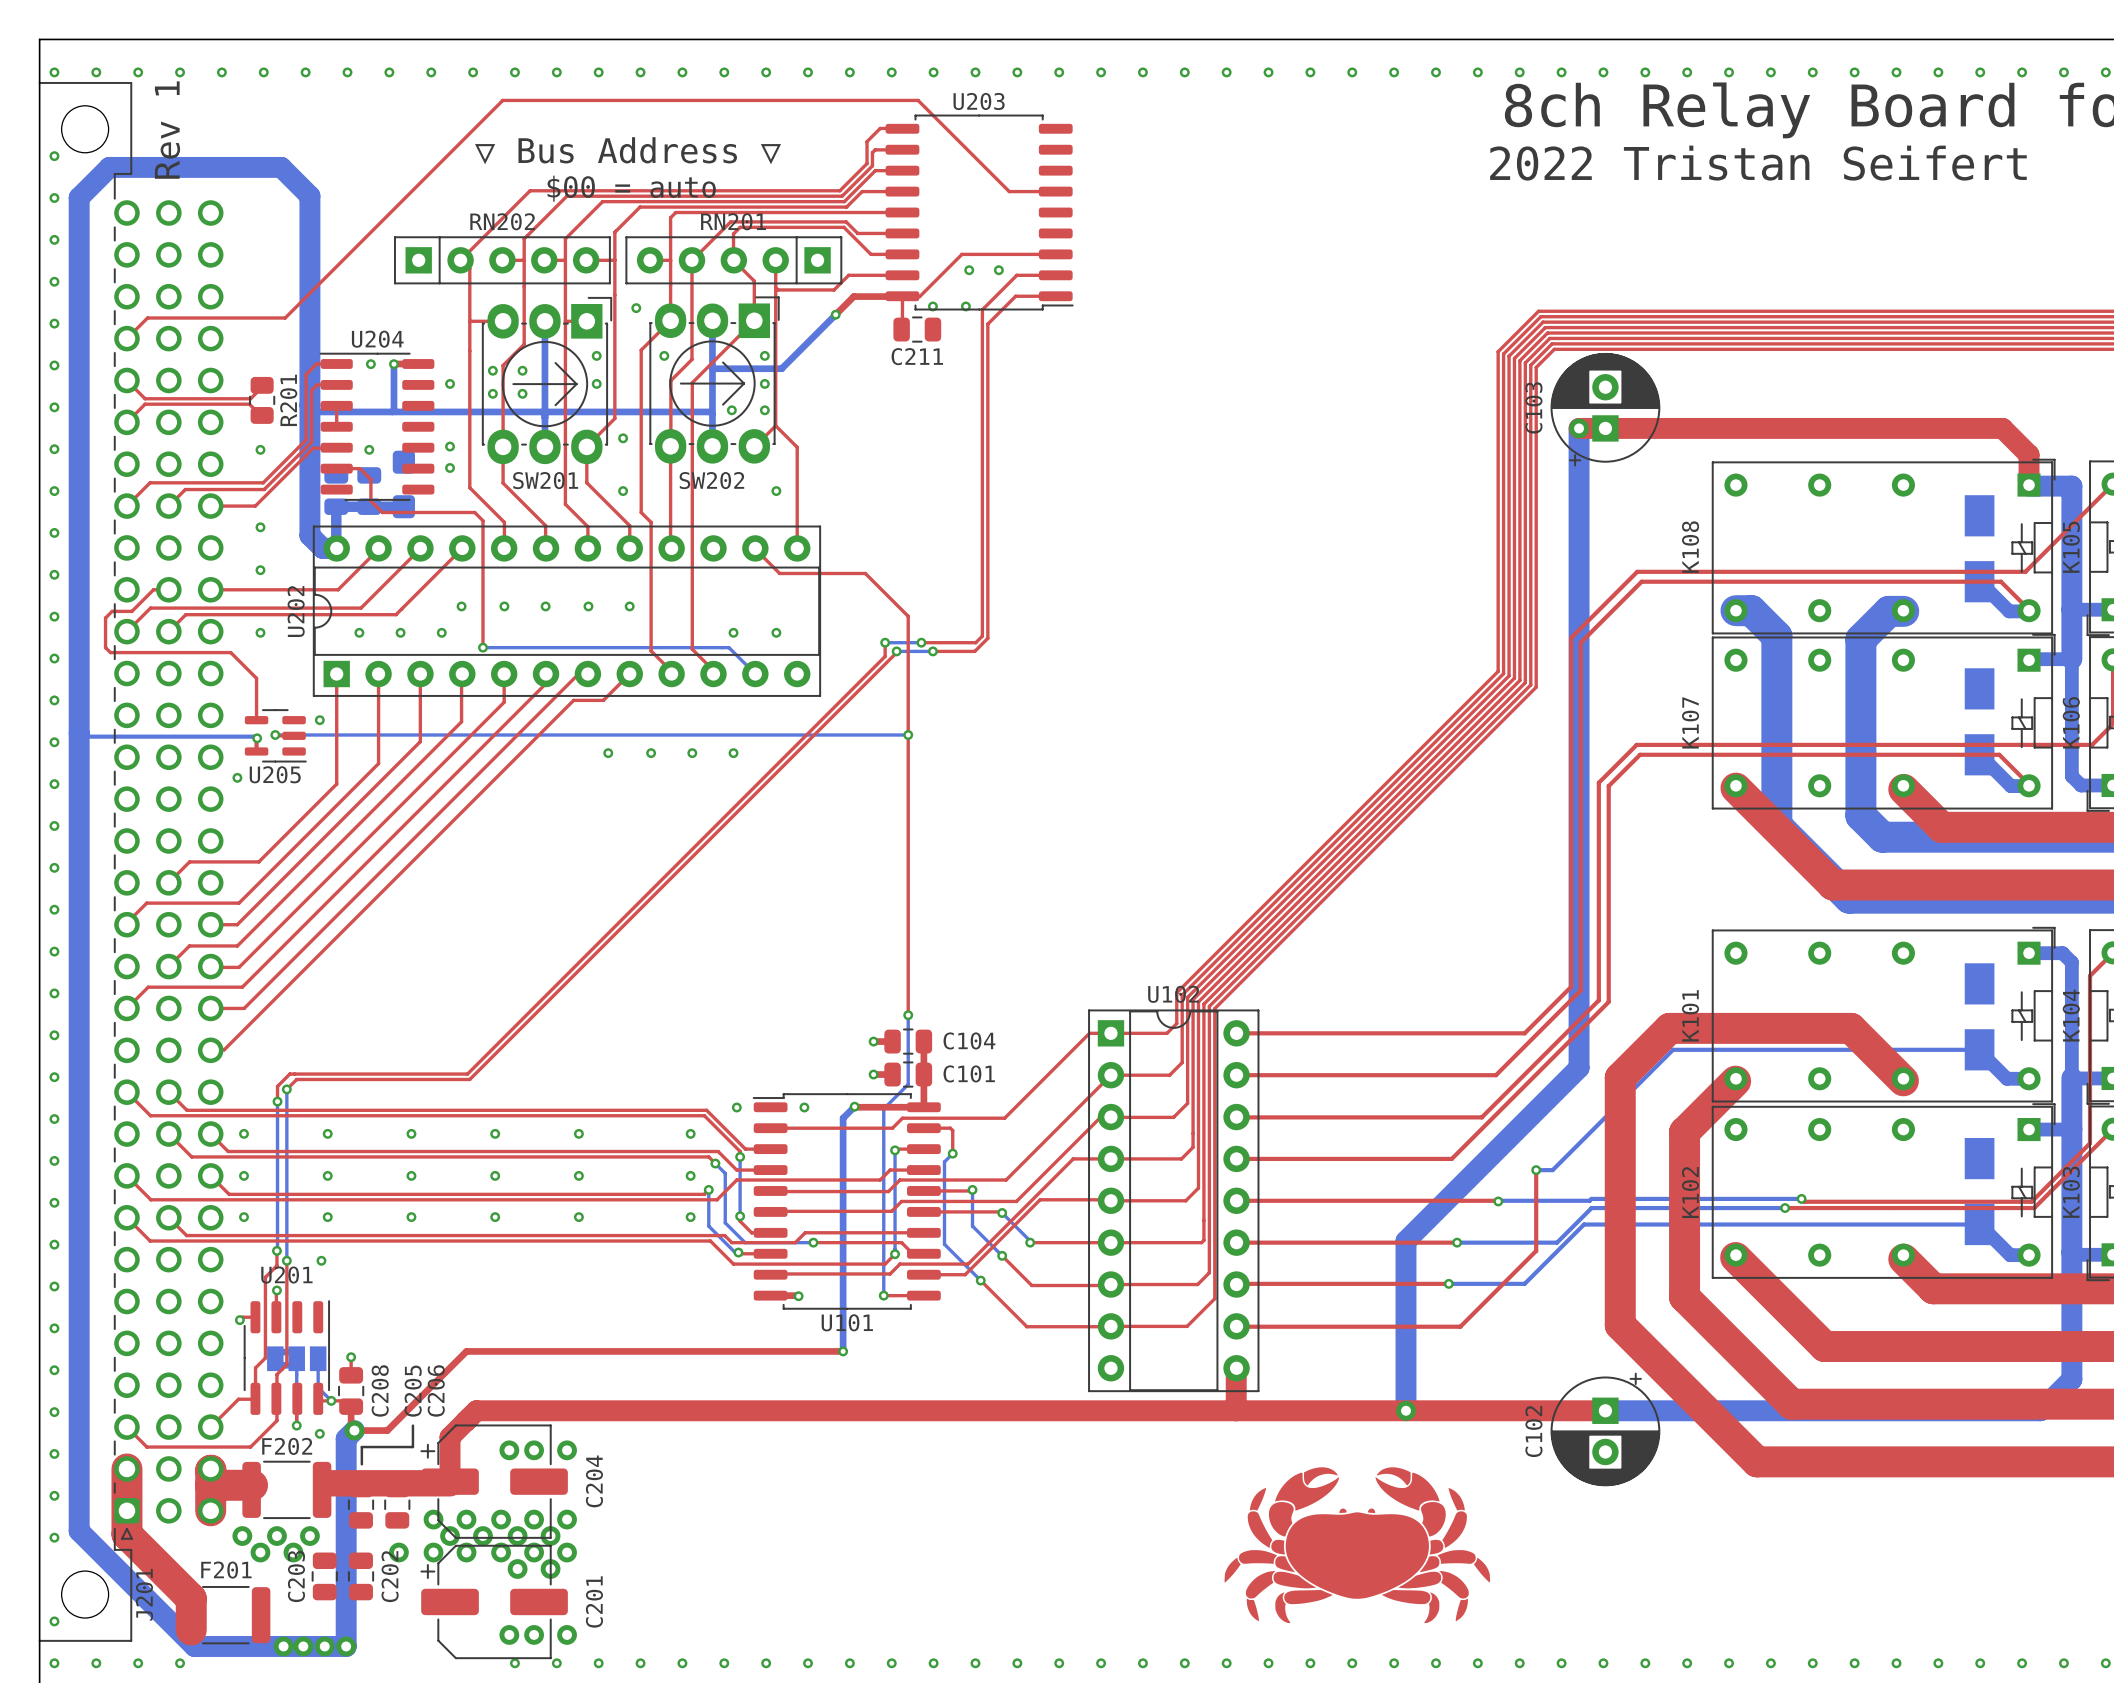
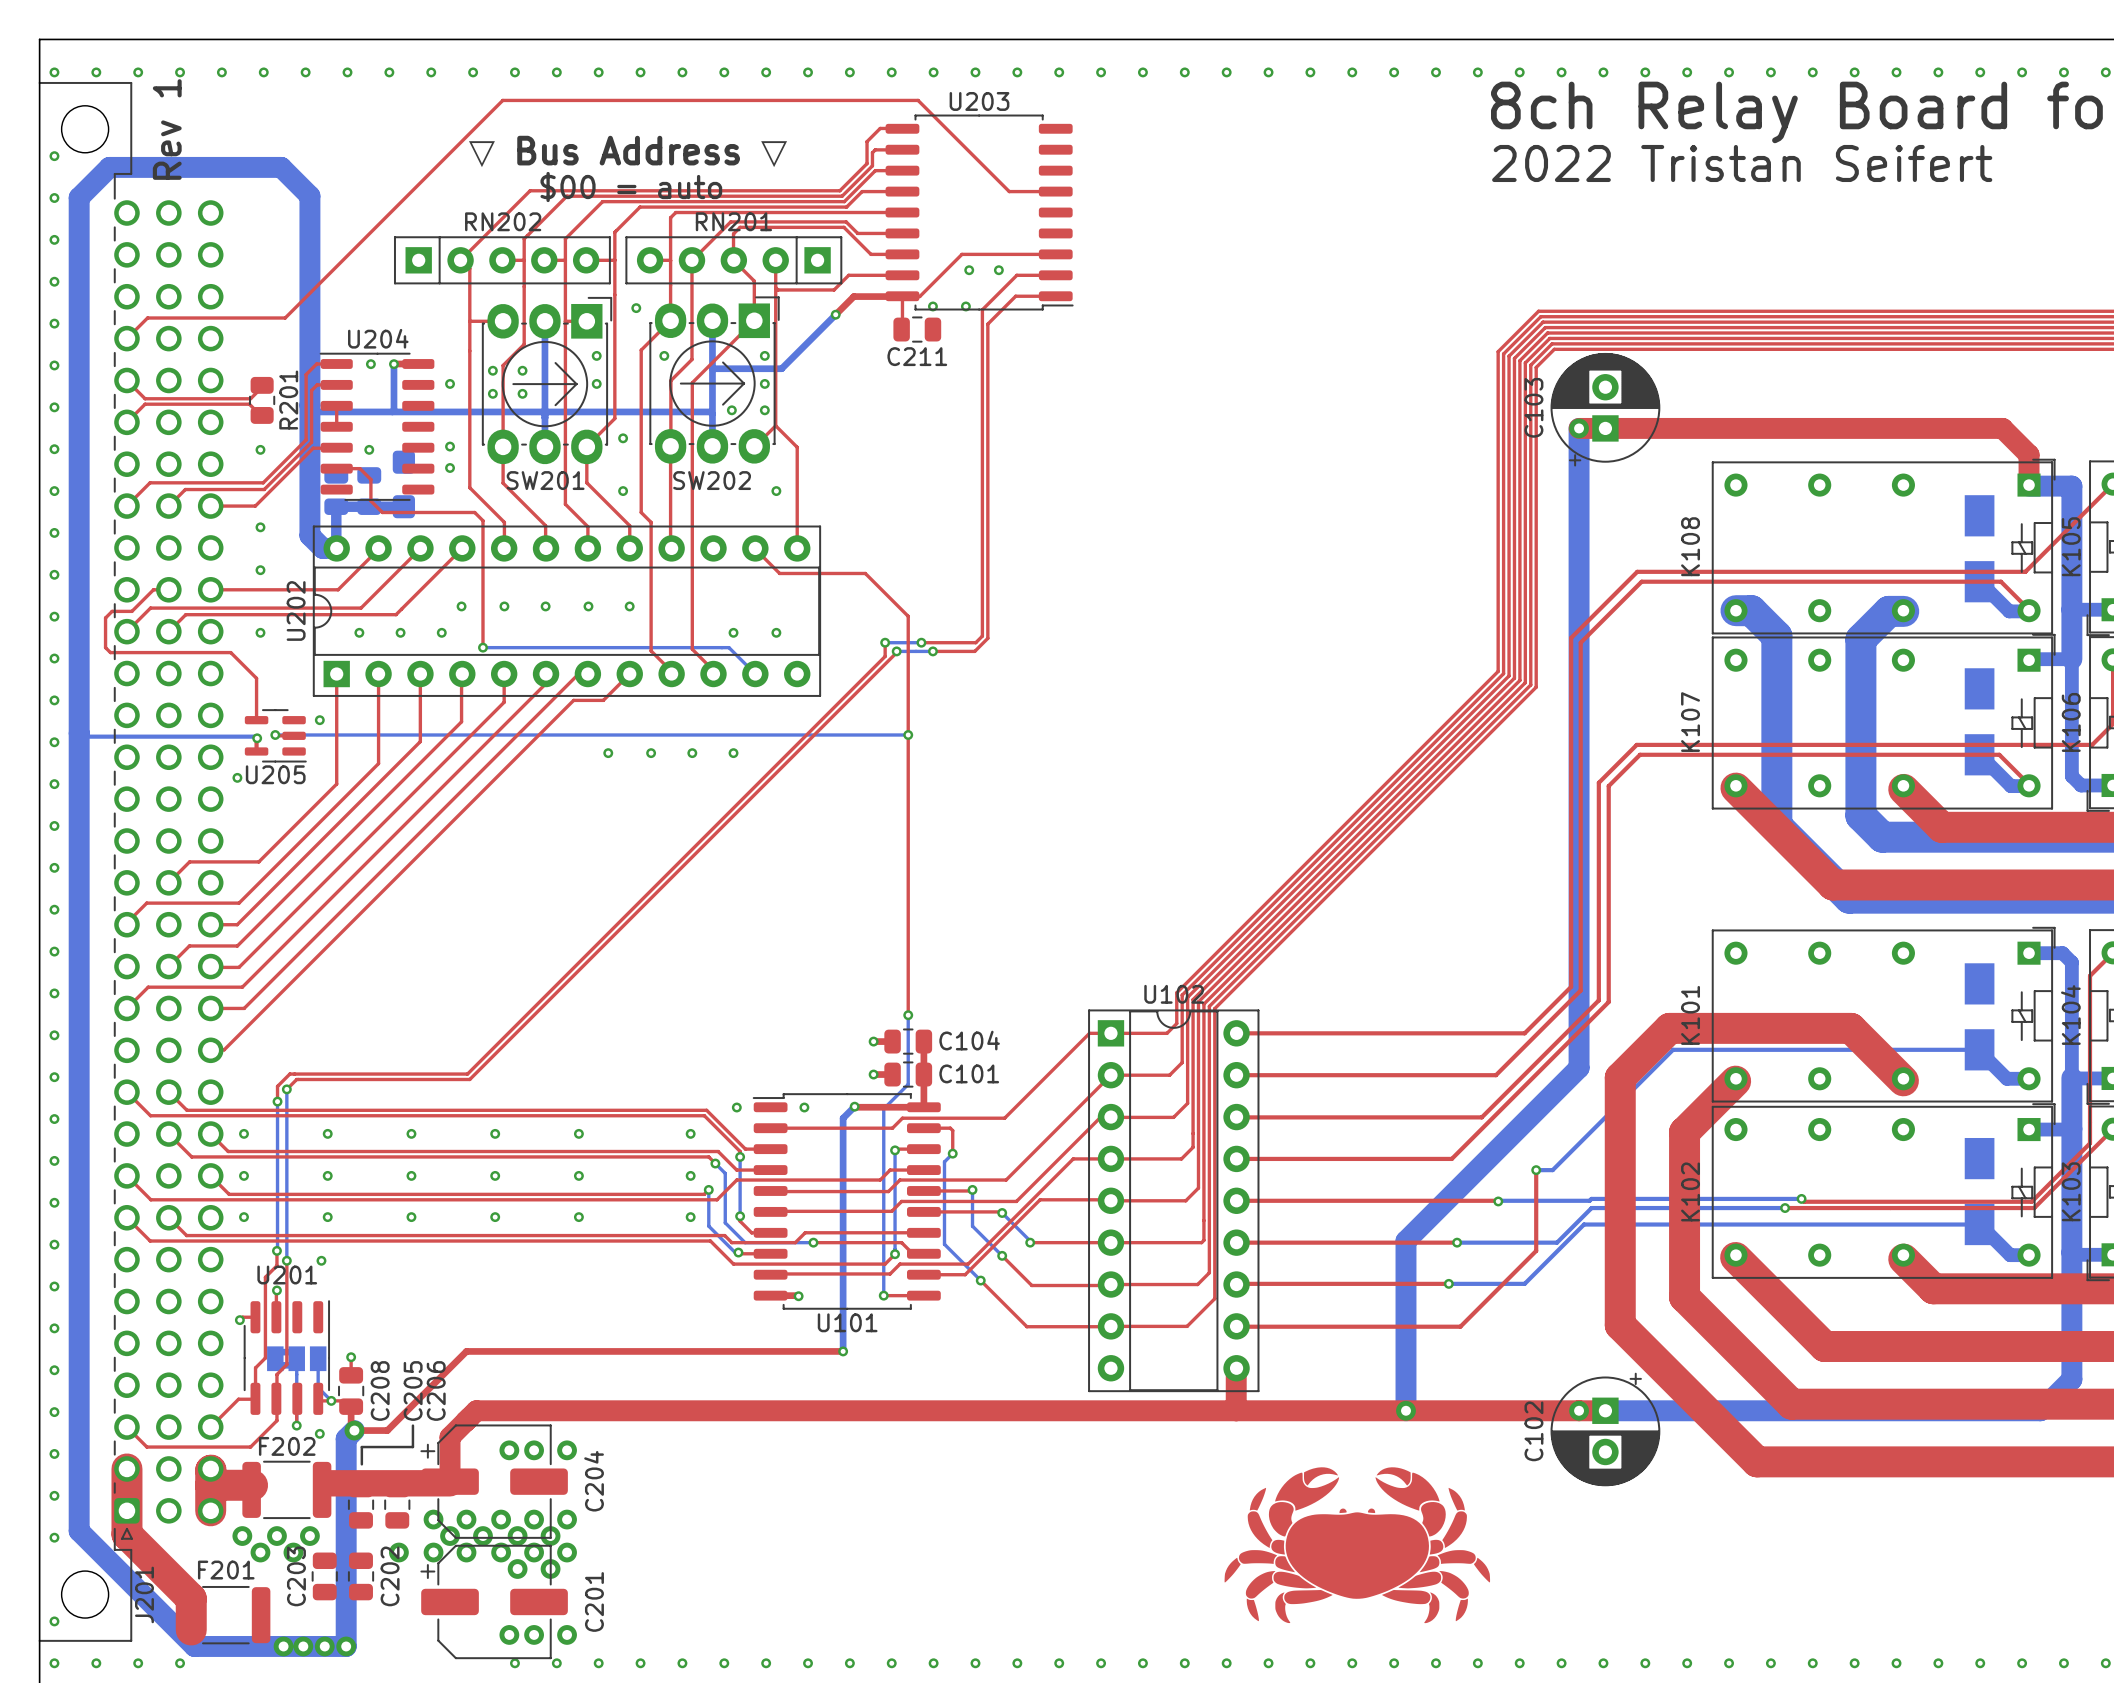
via: none -> (1579, 1410)

